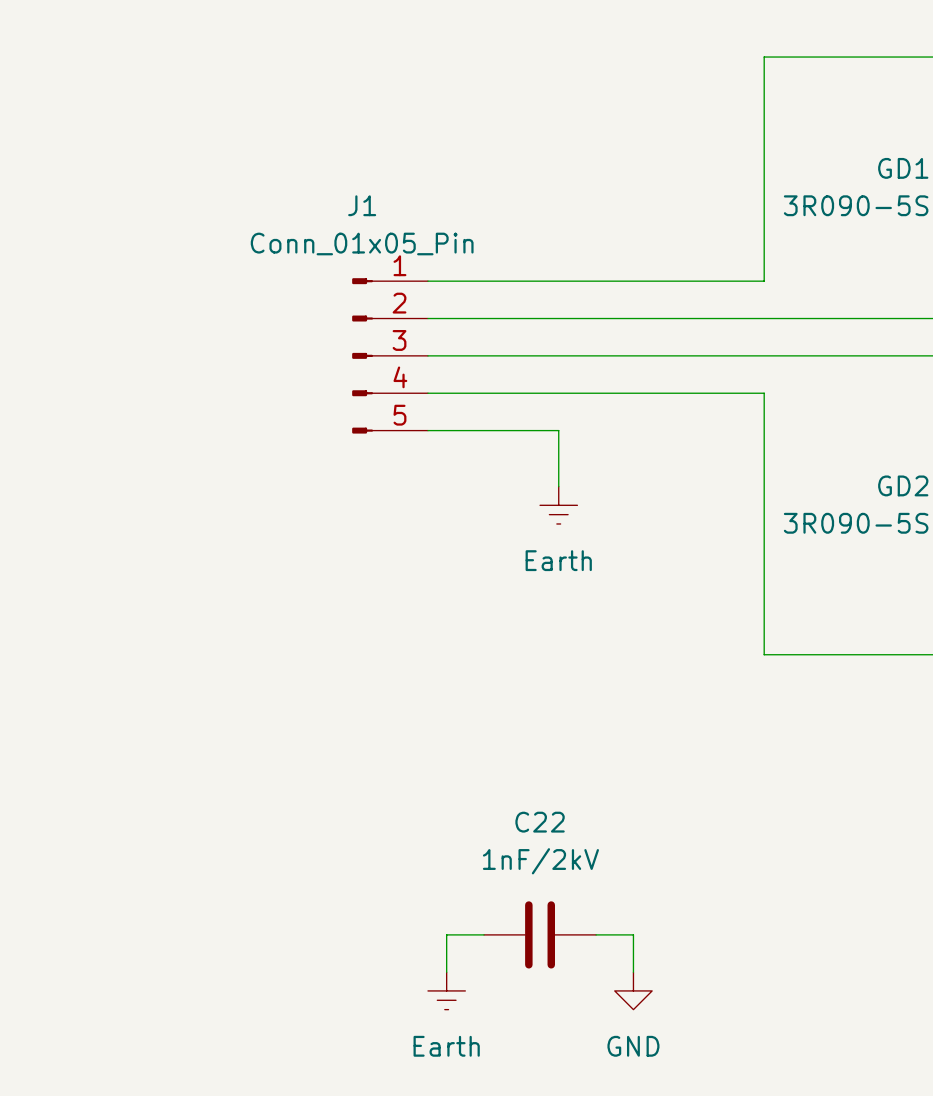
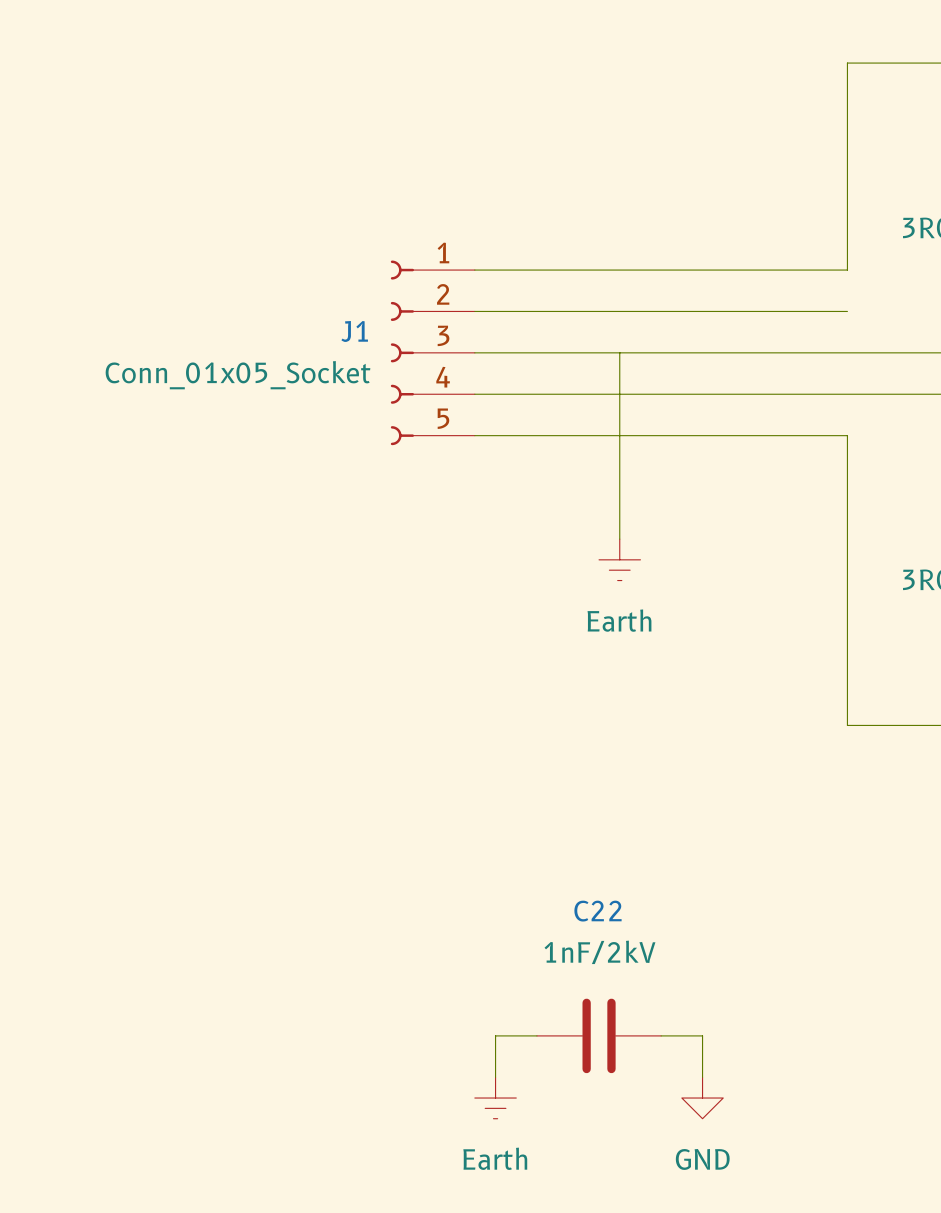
J1 name position: J1 (362, 205) -> J1 (354, 331)
wire: (764, 243) (764, 281) -> (847, 270) (474, 270)
J1 value: Conn_01x05_Pin (362, 244) -> Conn_01x05_Socket (238, 375)
J1 symbol: [352, 278, 428, 434] -> [390, 260, 475, 446]
wire: (427, 430) (558, 430) -> (619, 352) (619, 477)

